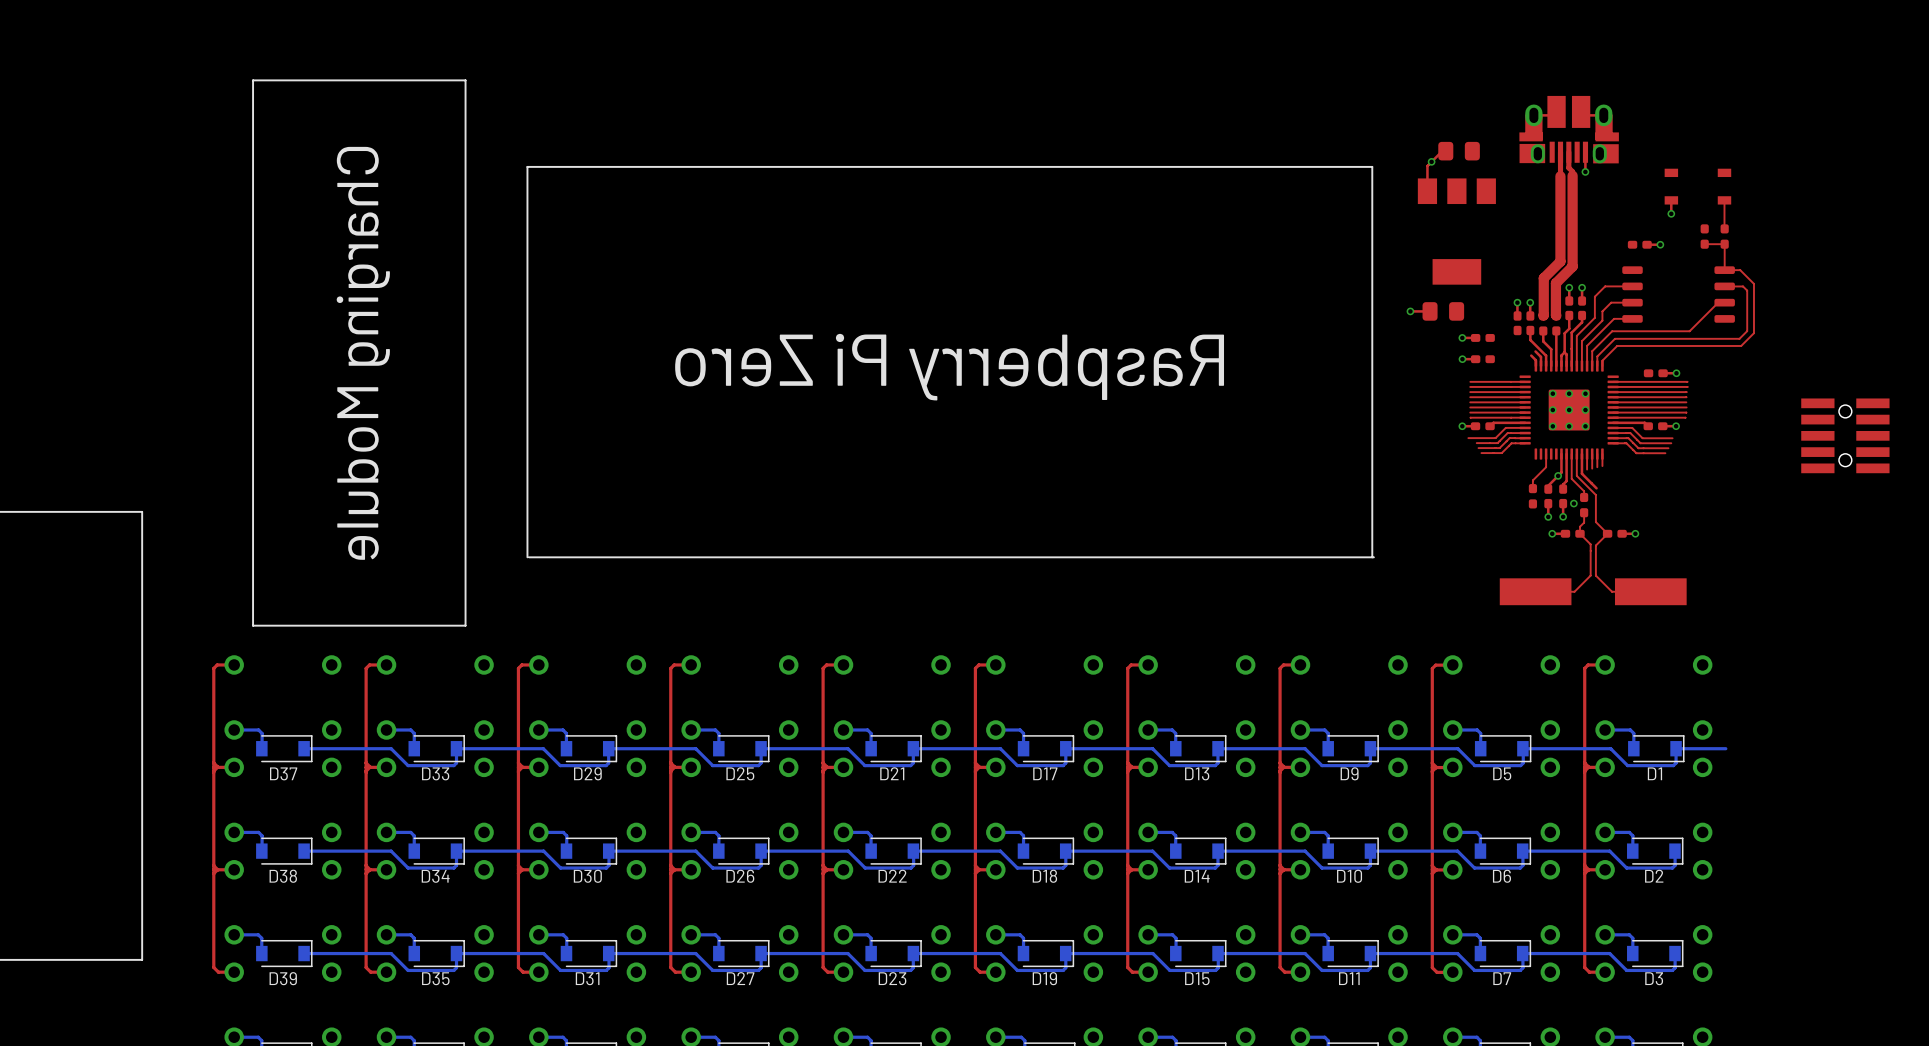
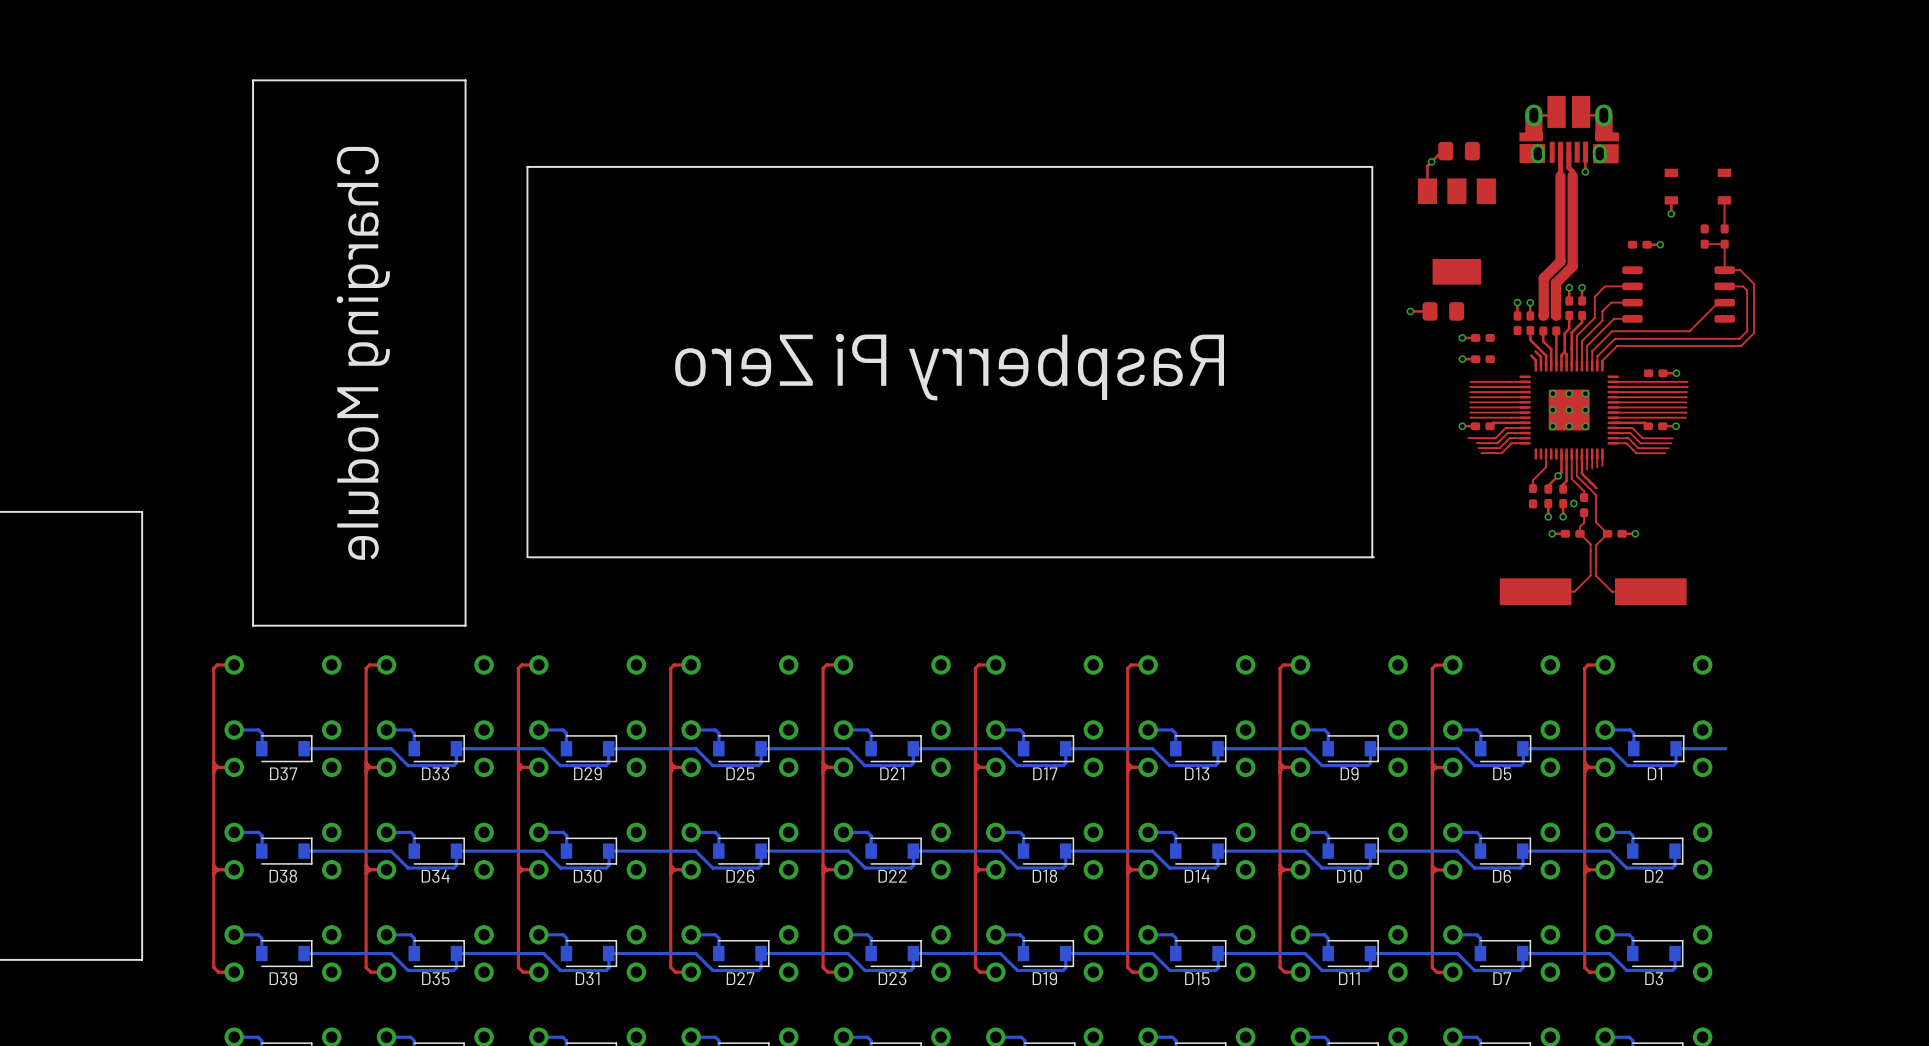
part: (1845, 435) -> none

